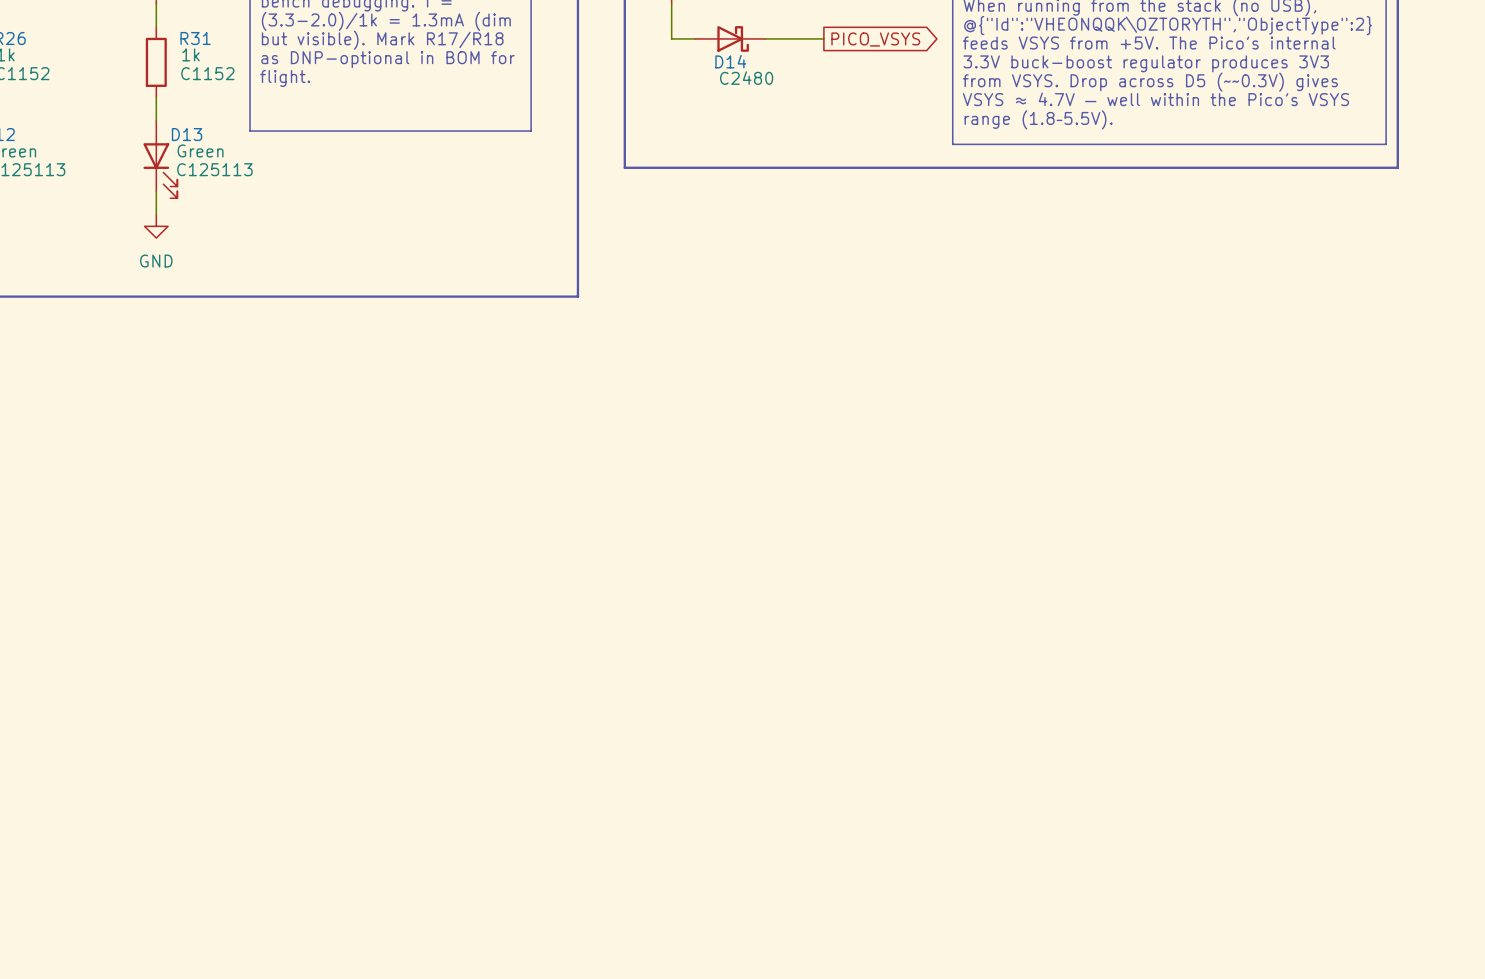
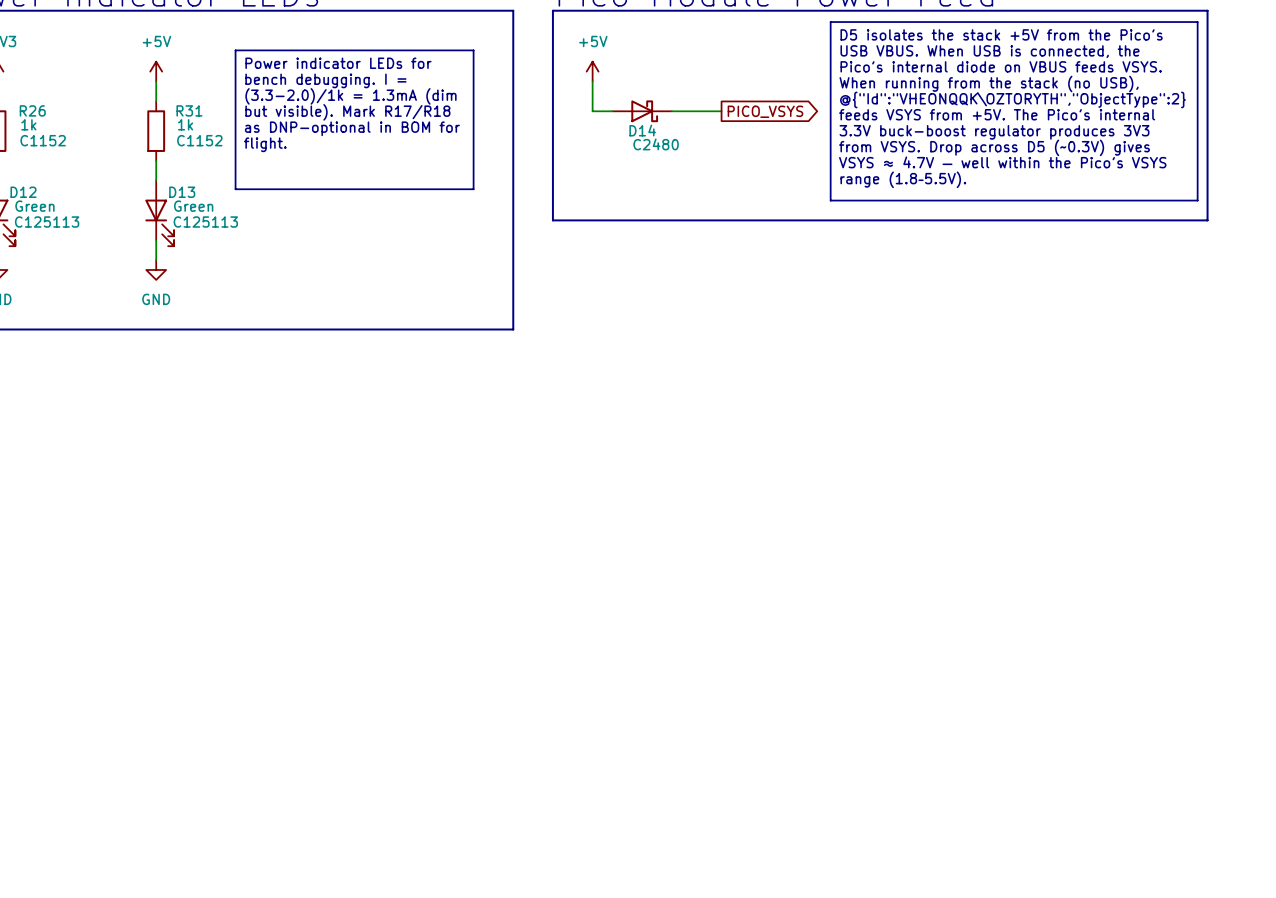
text: from VSYS. Drop across D5 (~~0.3V) gives (1150, 82) -> from VSYS. Drop across D5 (~0.3V) gives (994, 147)

